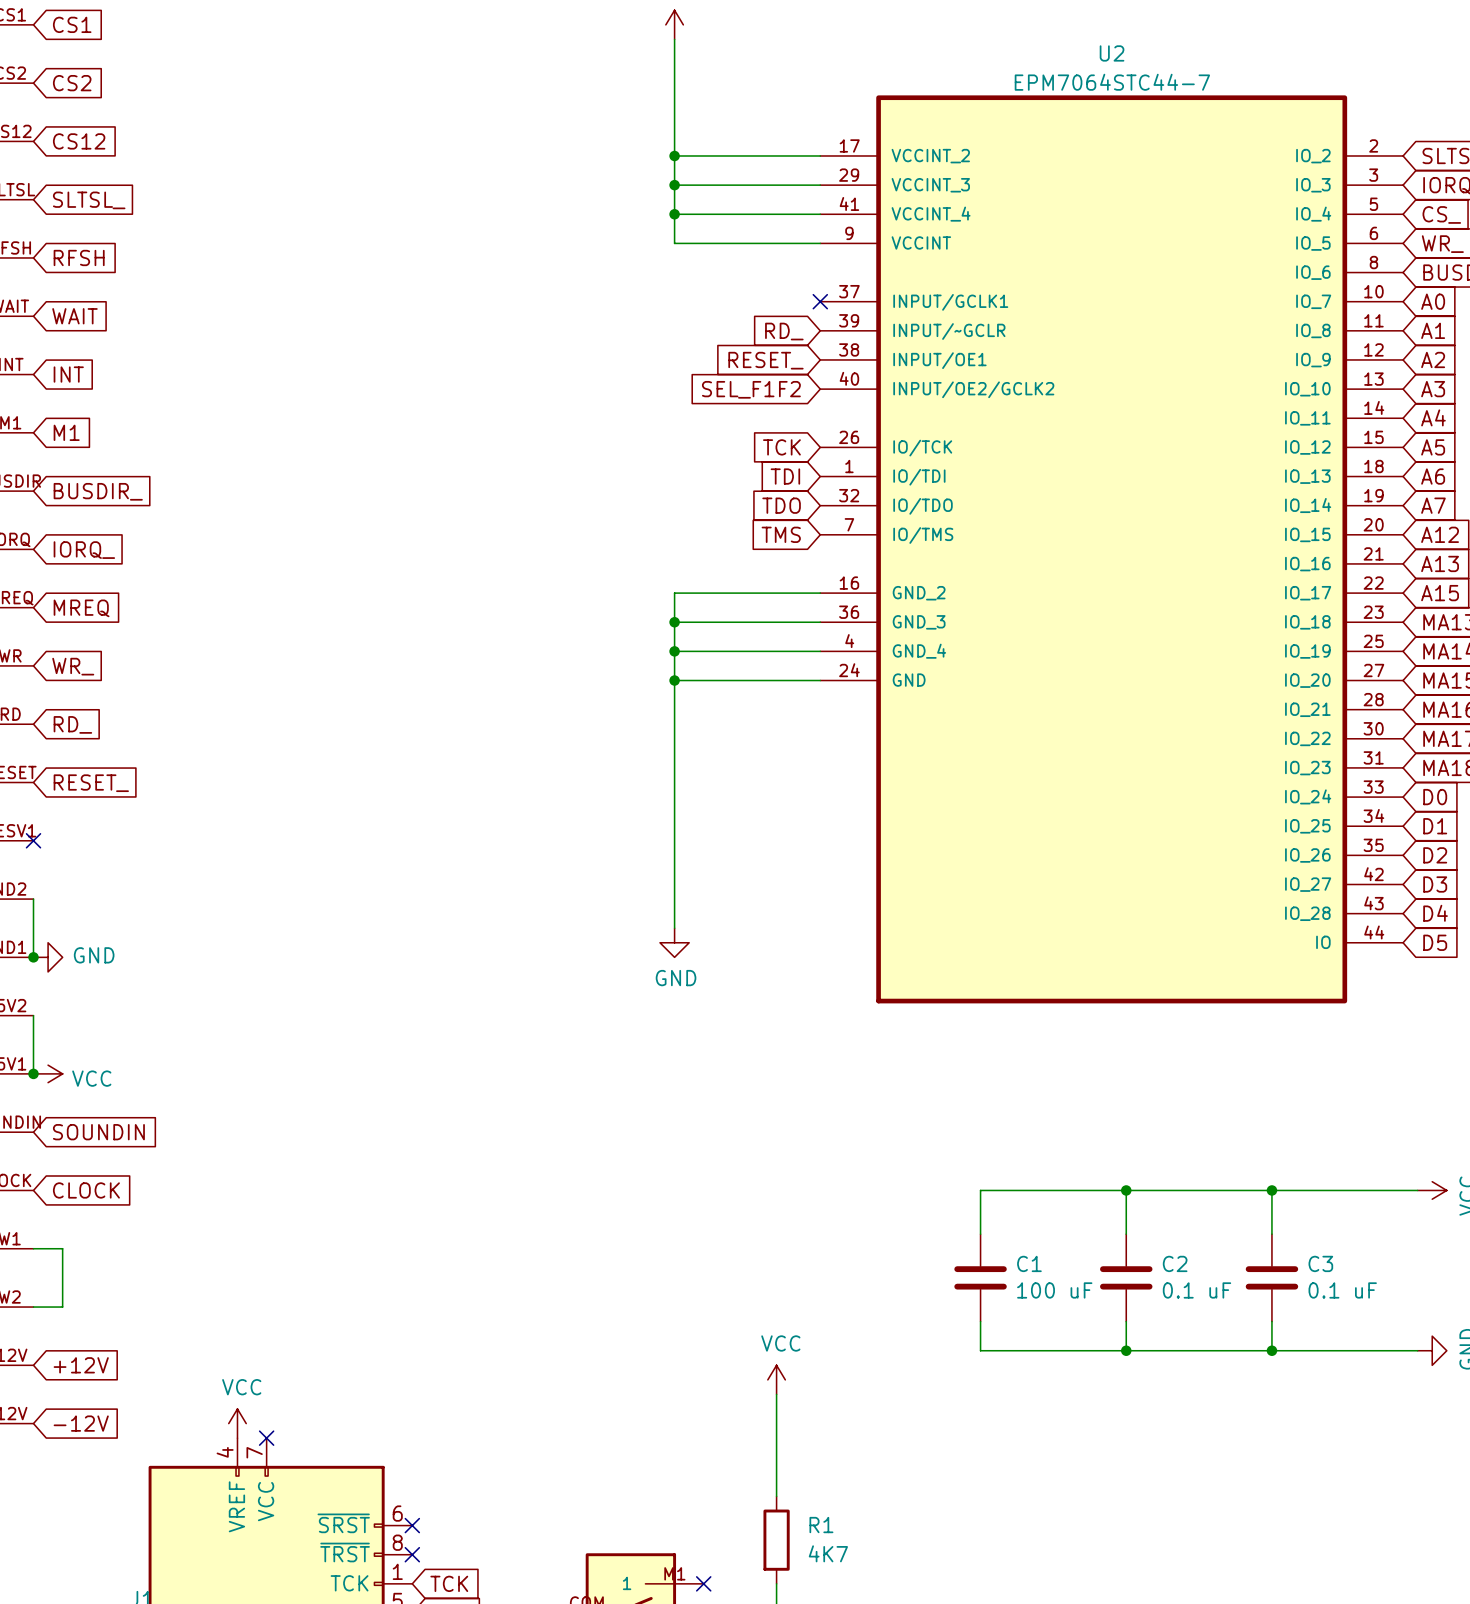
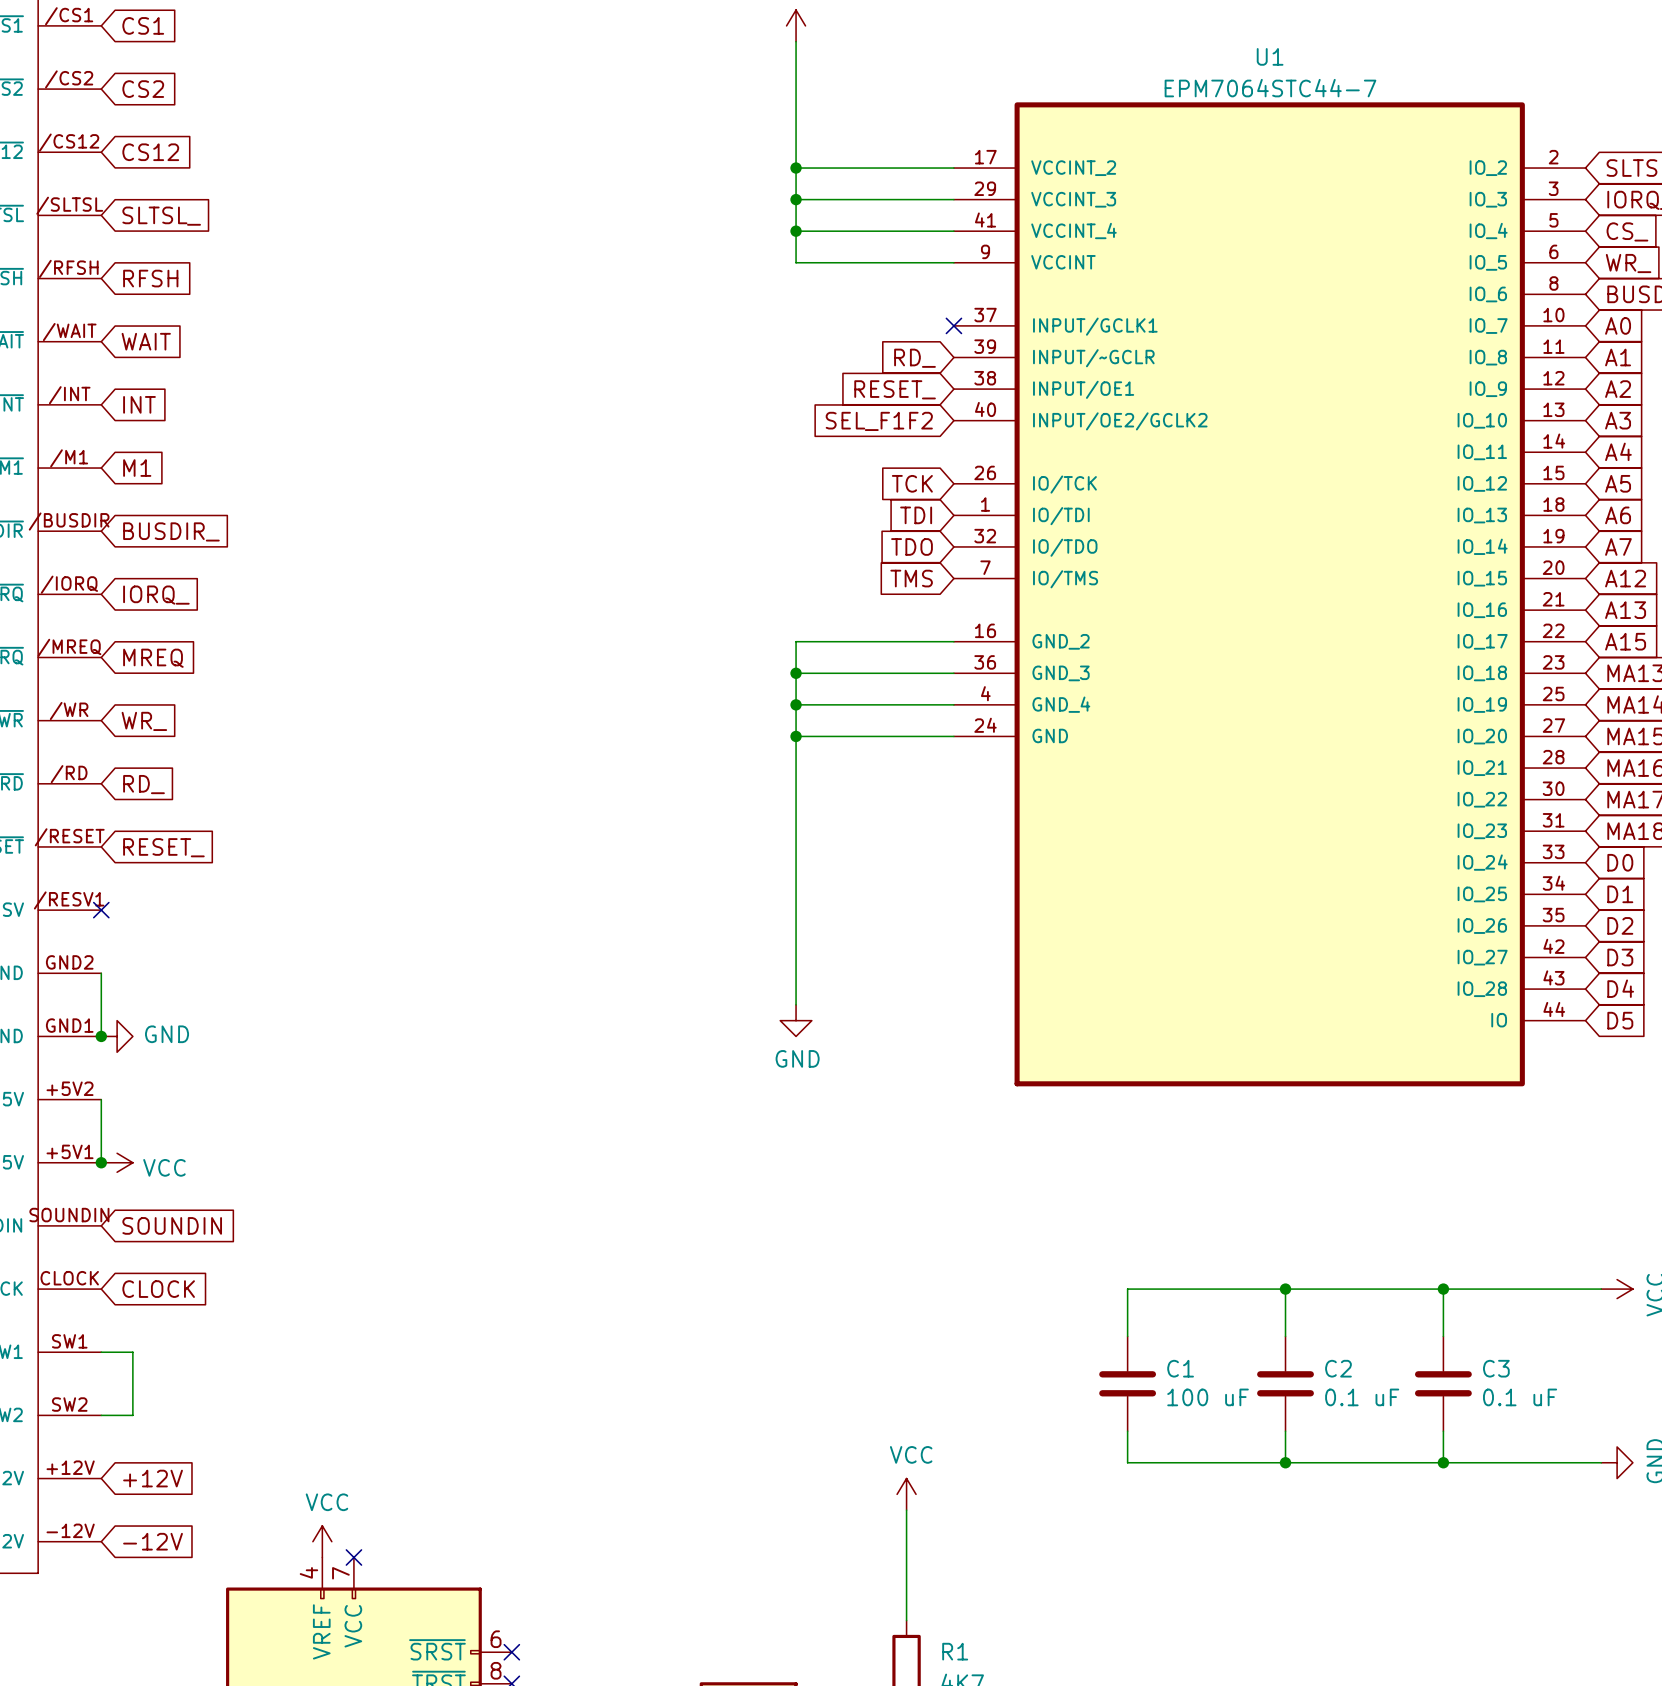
U2 name: U2 (1112, 53) -> U1 (1270, 56)

